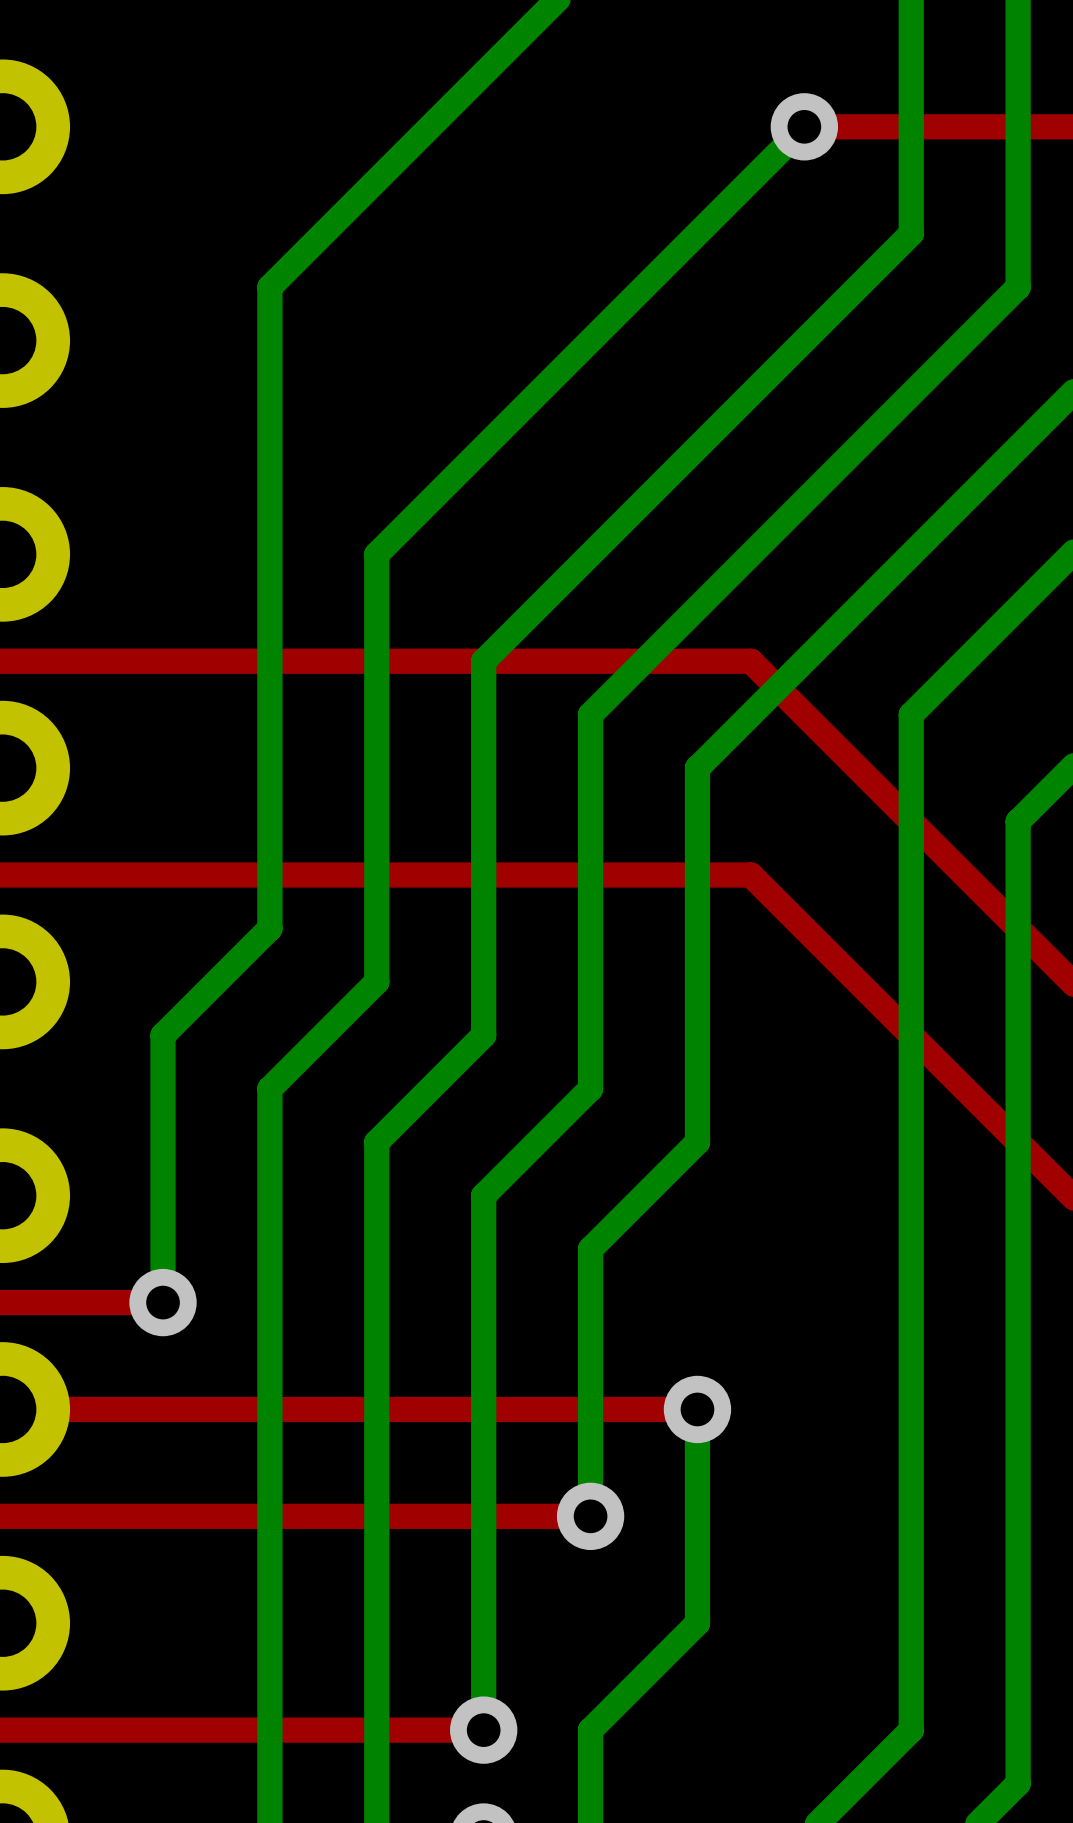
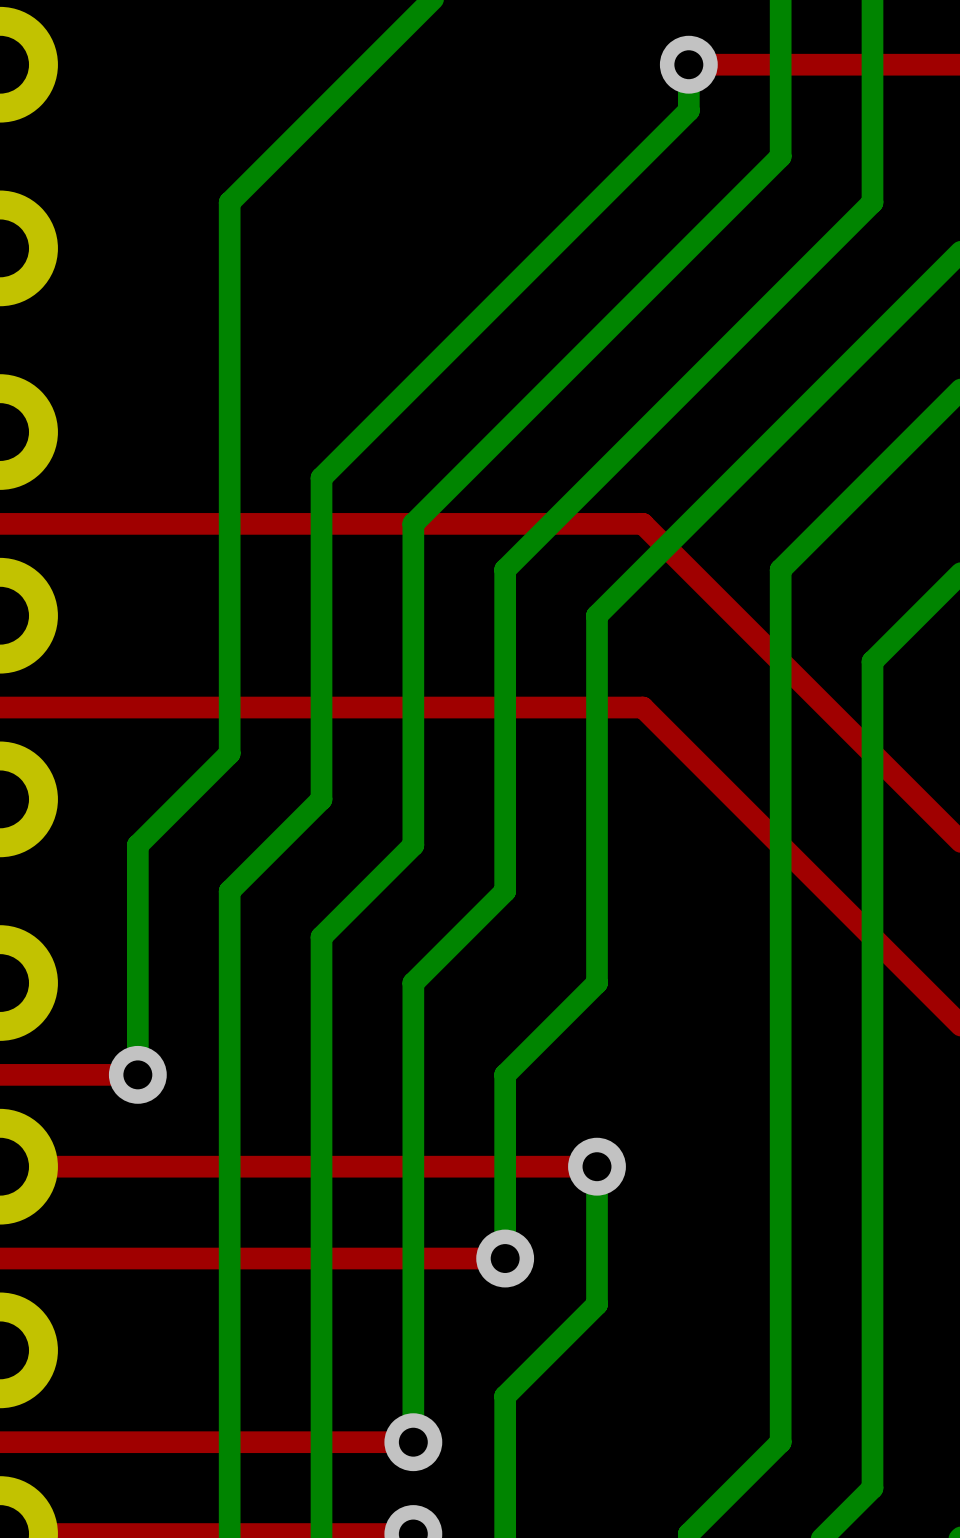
bottom track: (804, 126) (376, 554) (376, 607) -> (688, 64) (688, 110) (321, 477)
bottom track: (697, 1142) (590, 1249) (590, 1302) -> (597, 937) (597, 983) (505, 1074)
bottom track: (697, 1569) (697, 1623) (590, 1730) -> (597, 1304) (505, 1396) (505, 1442)

